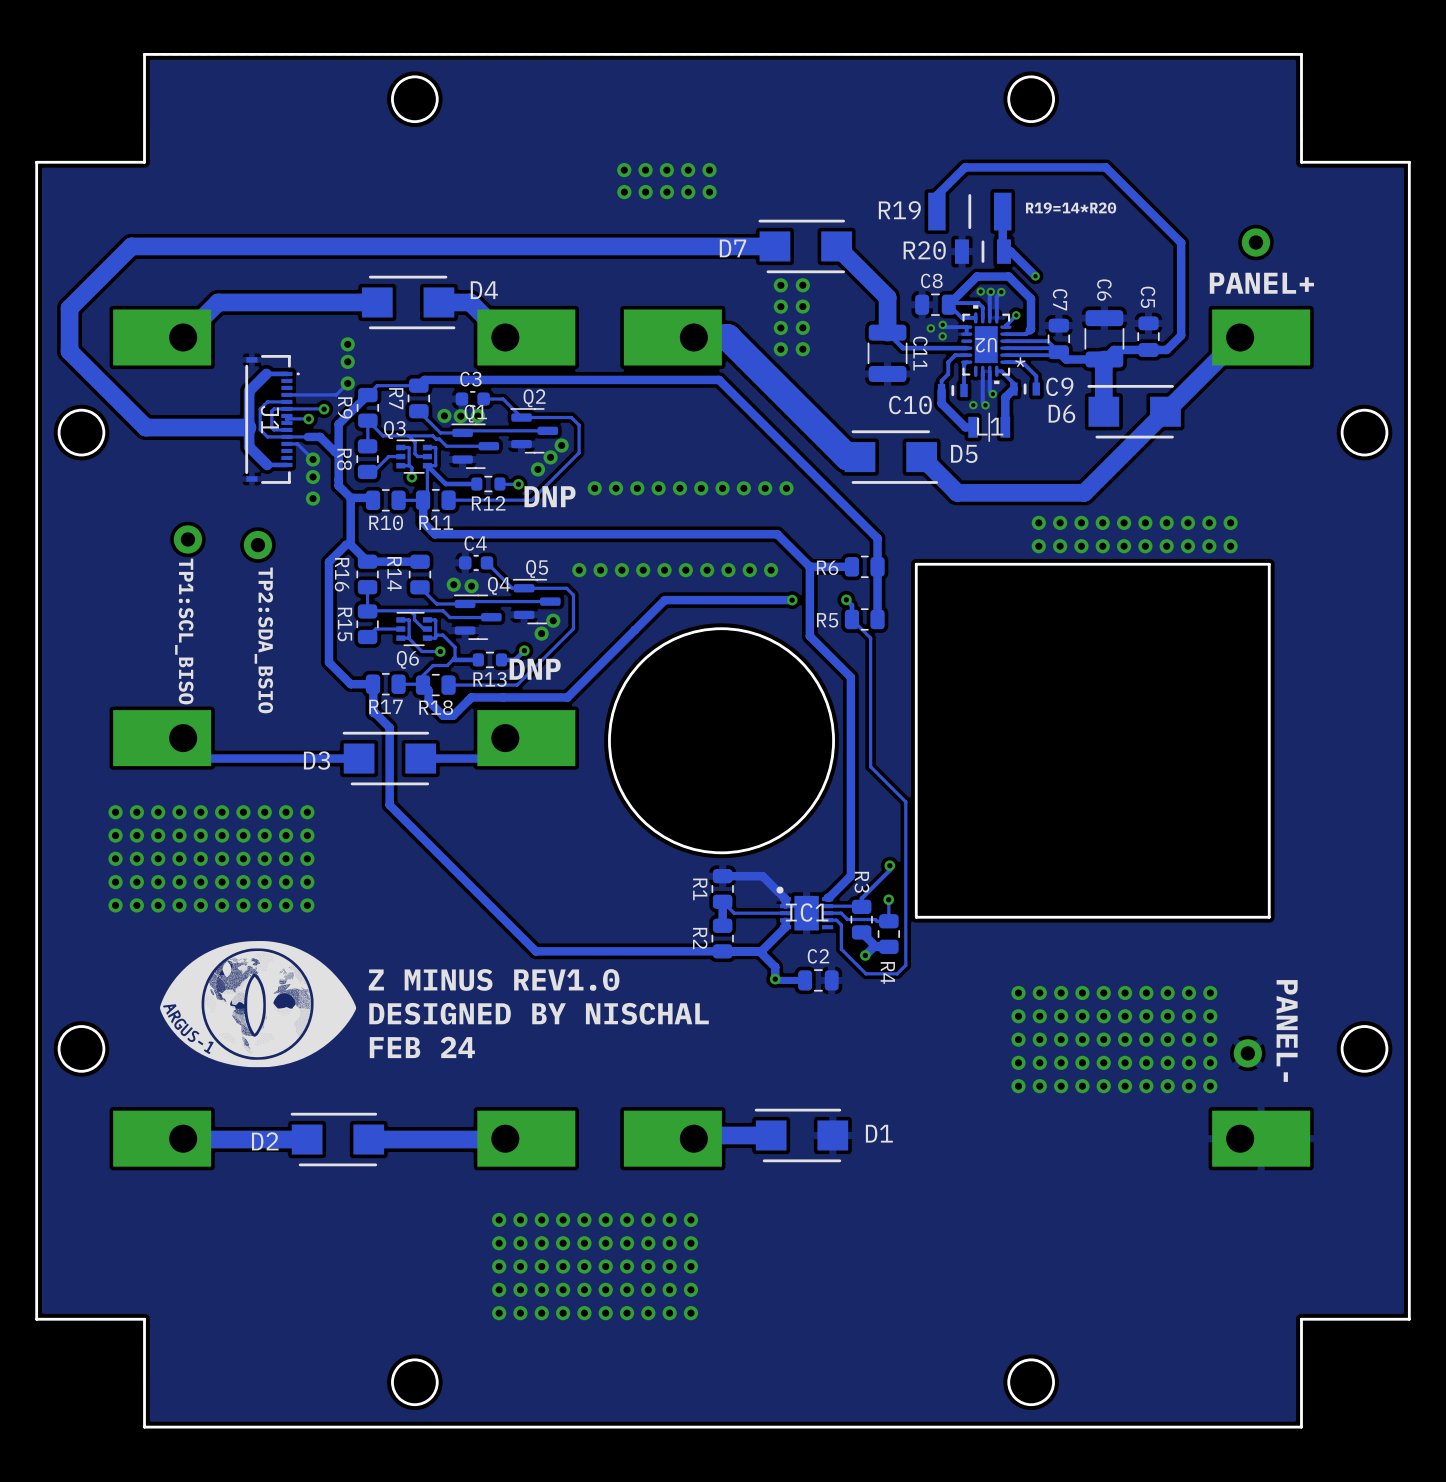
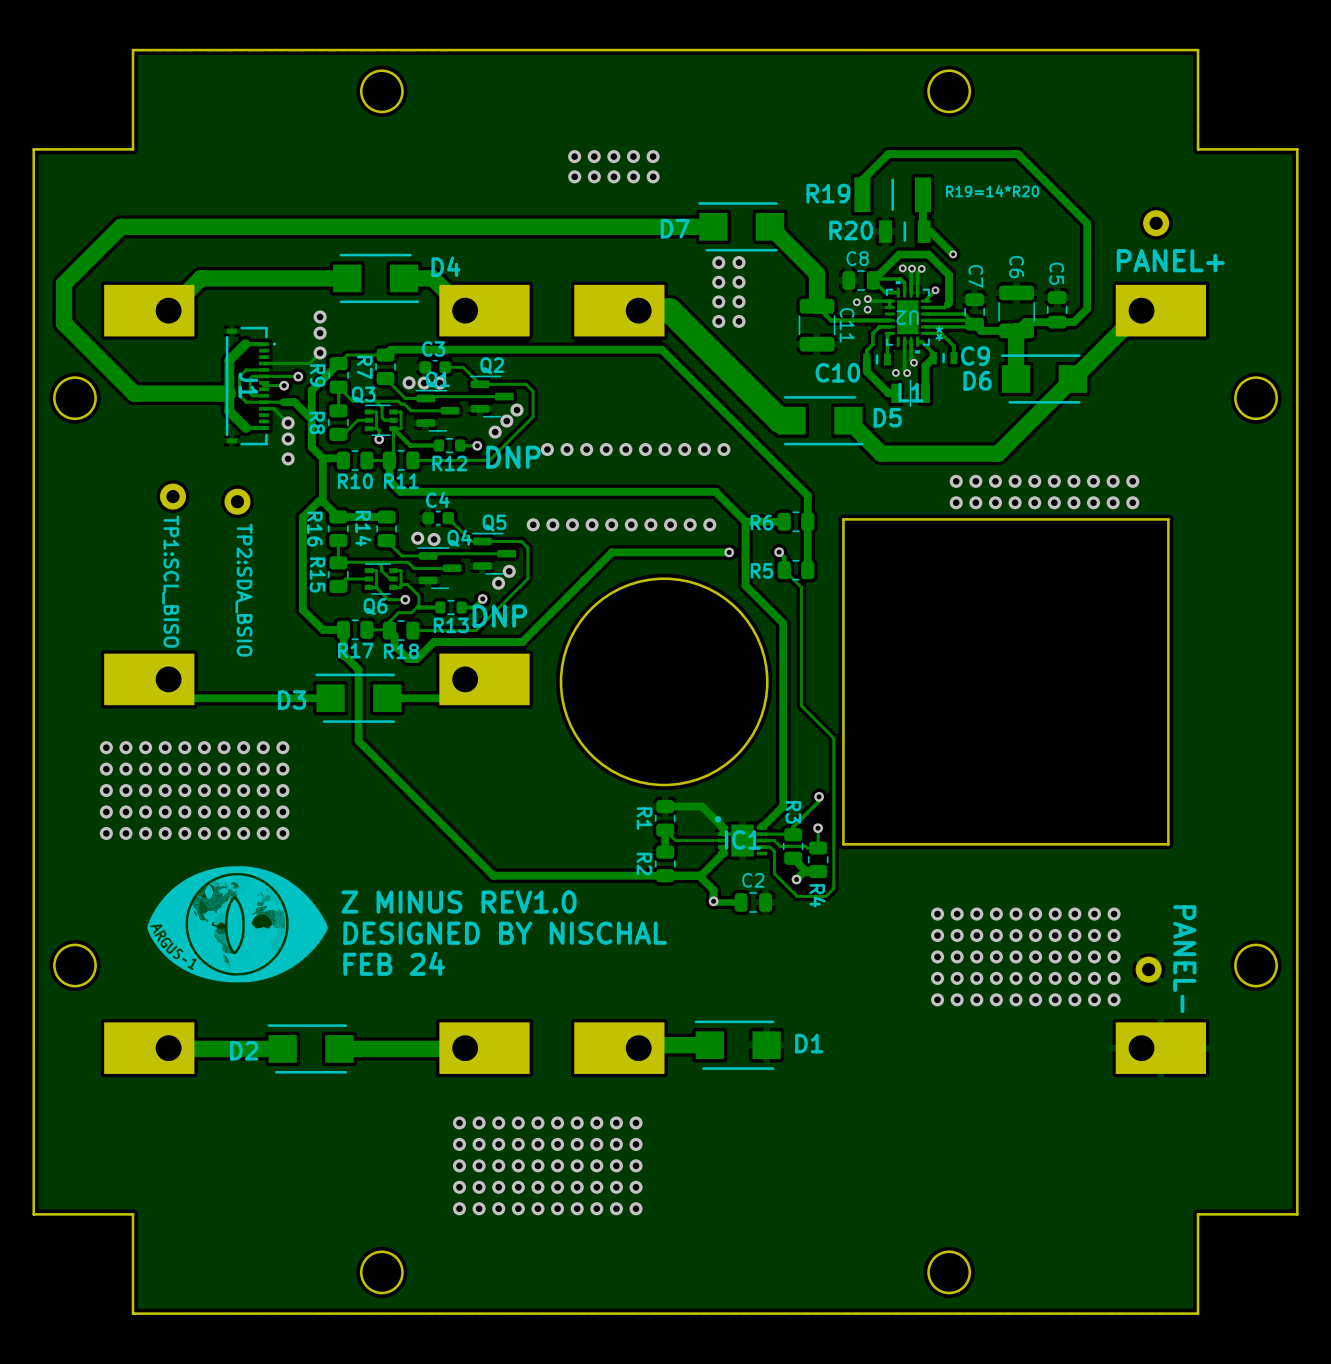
U2 footprint: [961, 305, 1012, 385] -> [884, 280, 932, 354]

